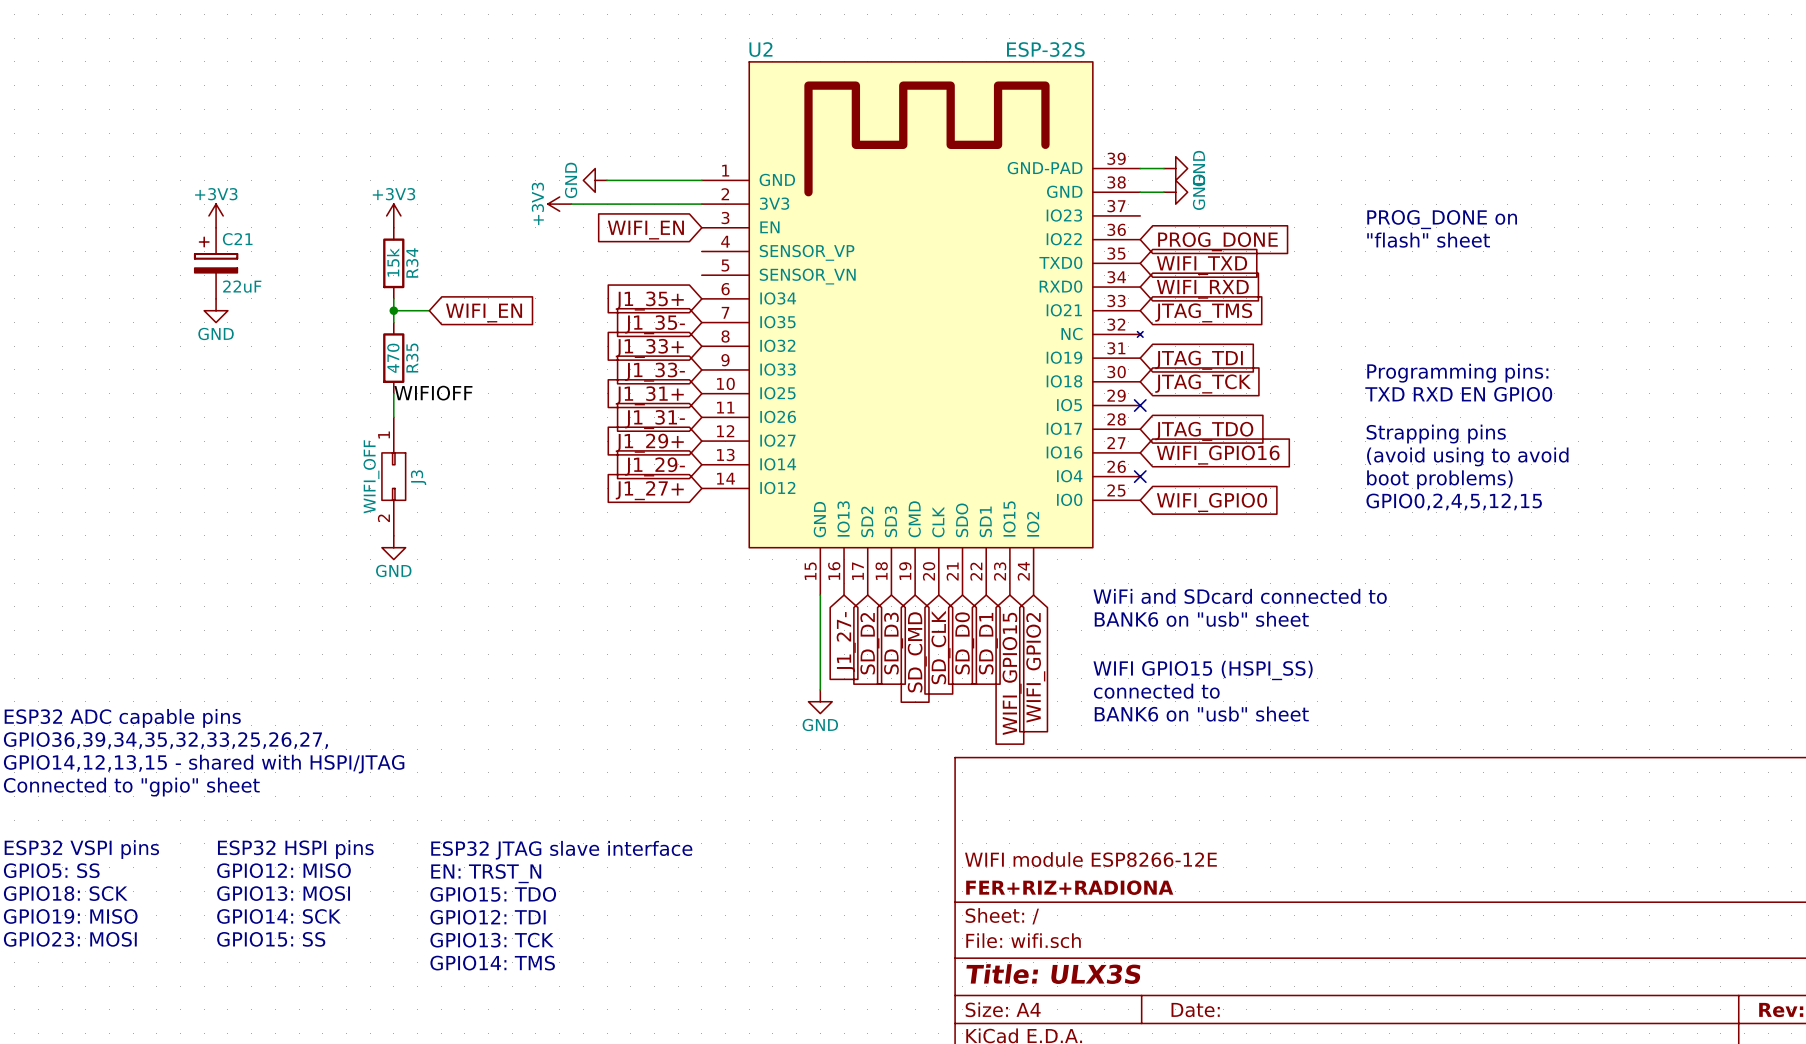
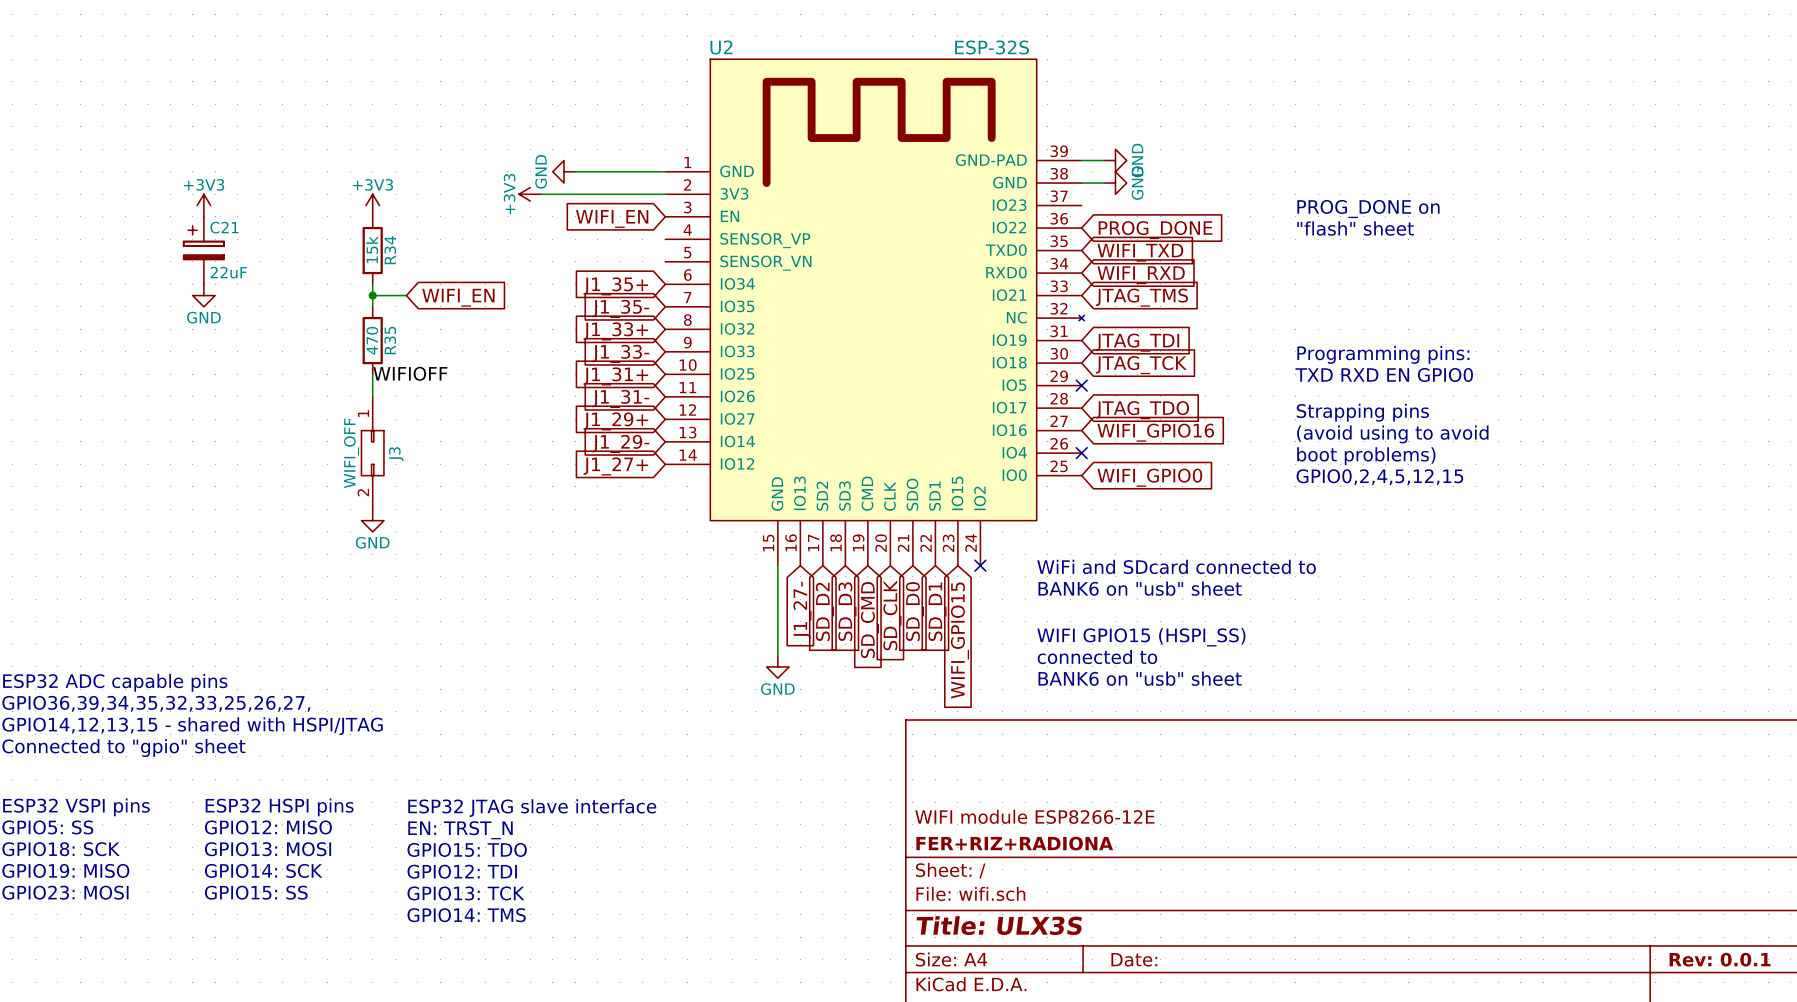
no-connect mark: none -> (980, 565)
global label: WIFI_GPIO2 (1035, 667) -> none

